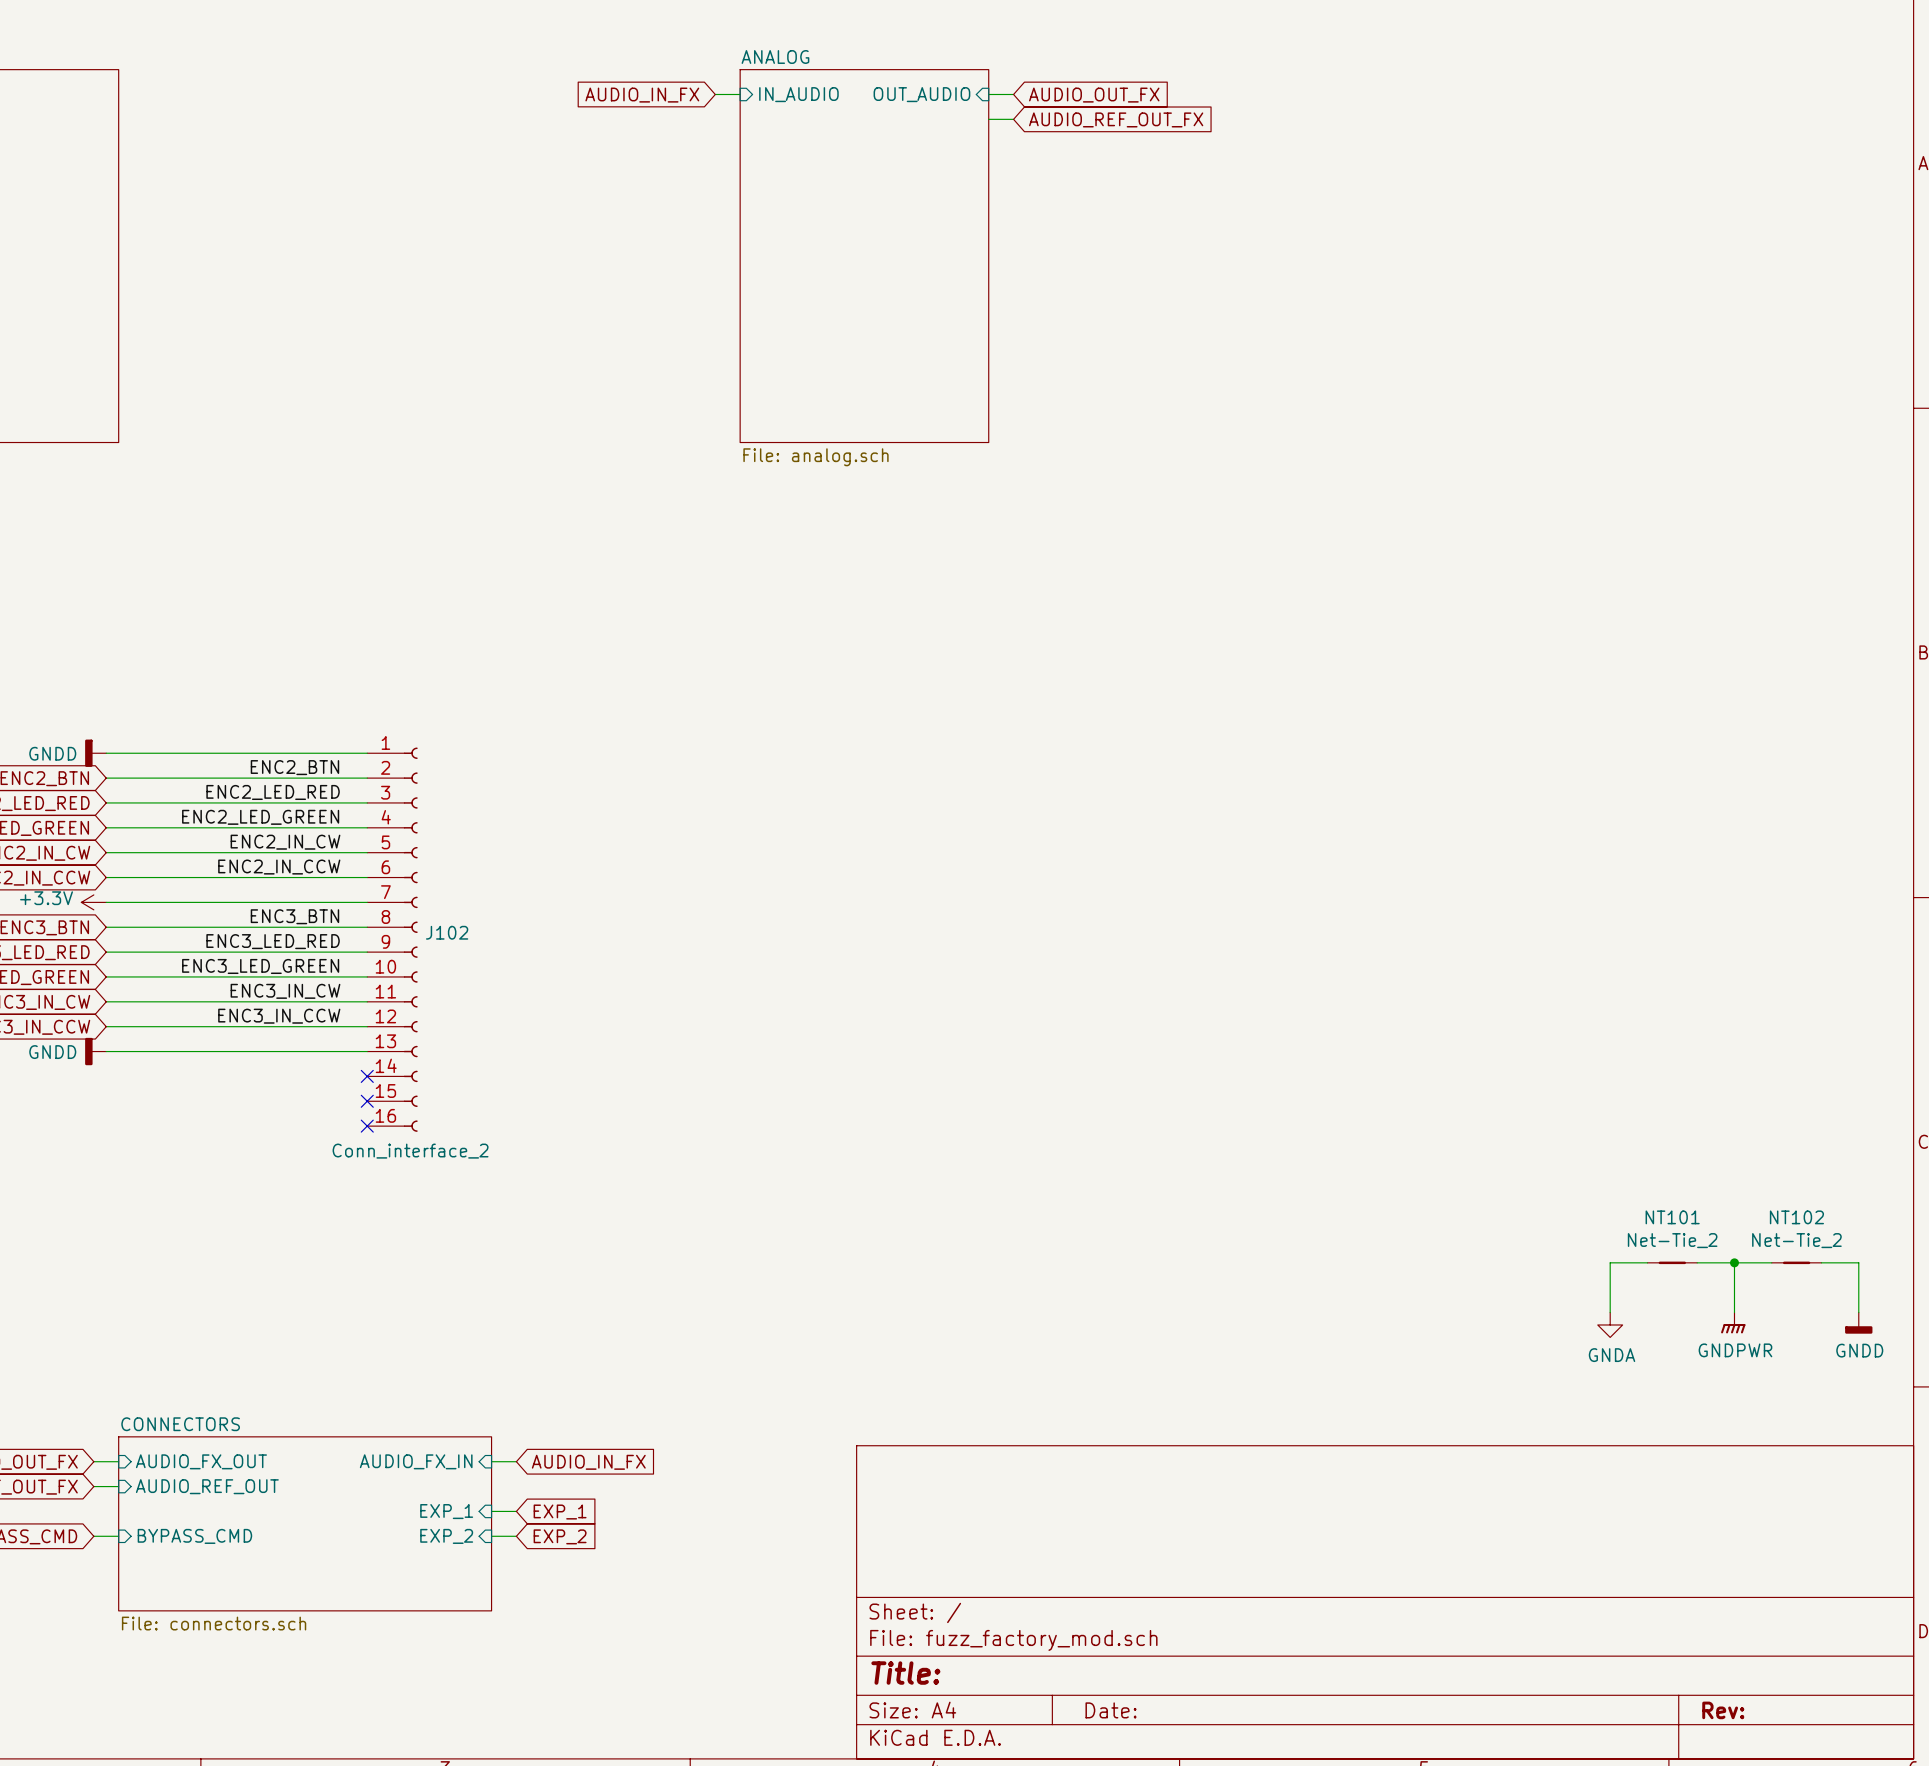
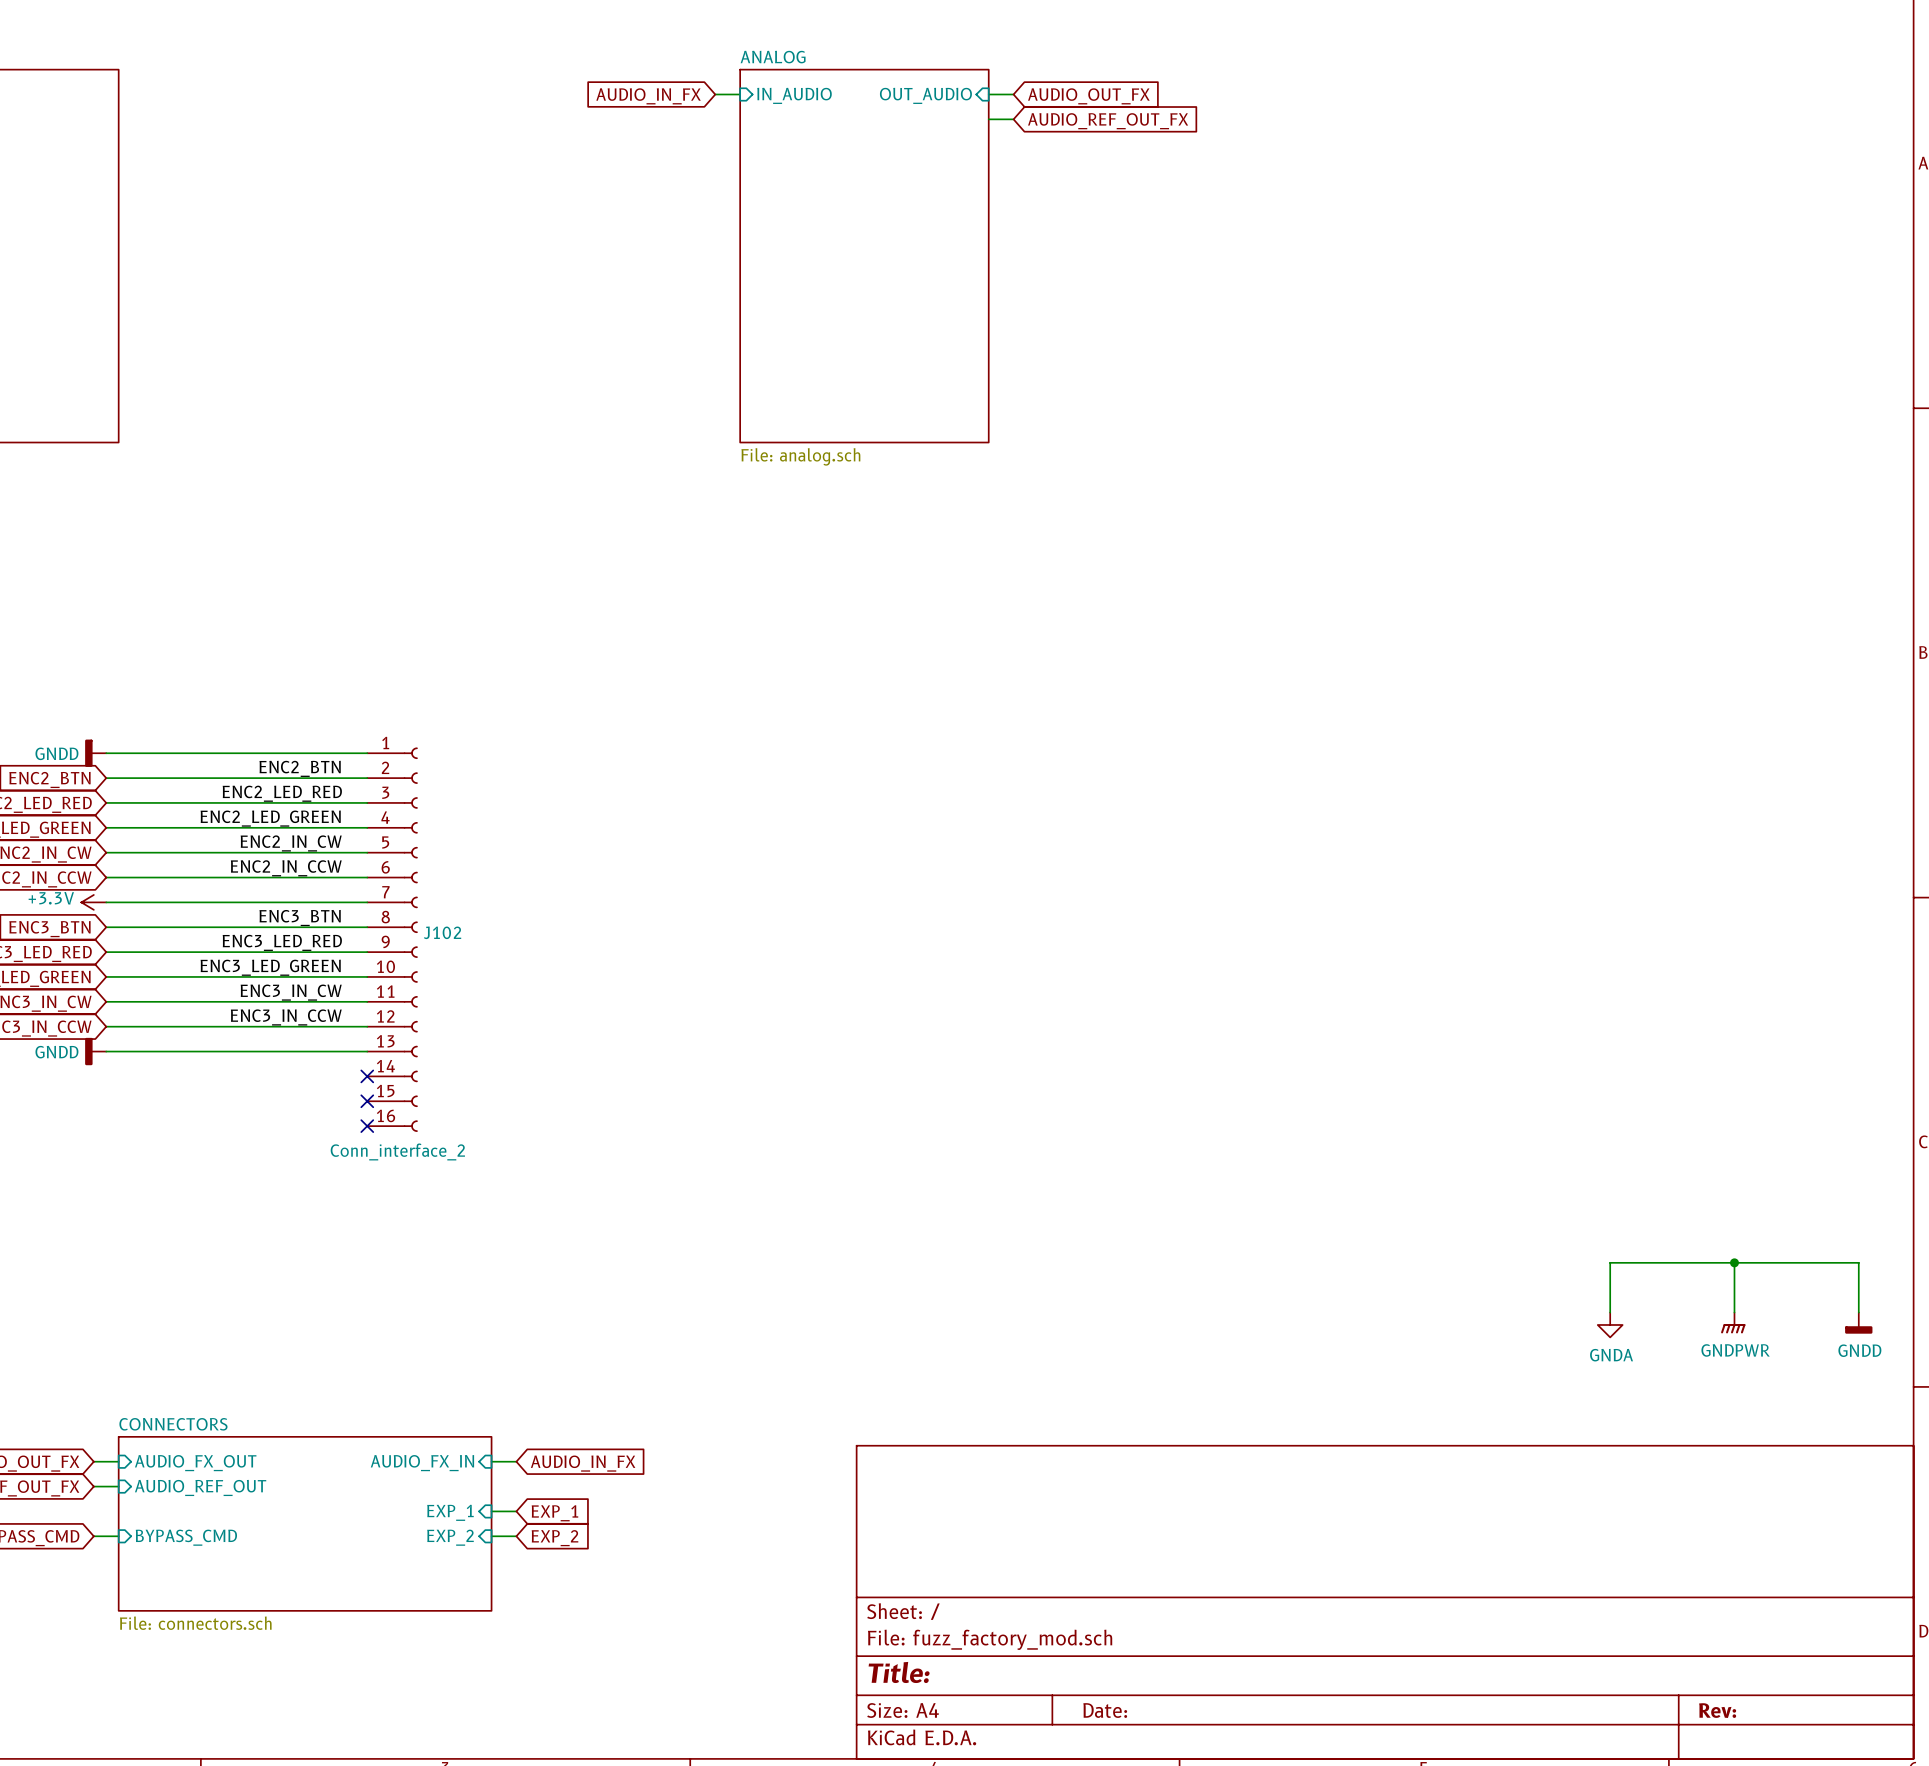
NT101: Net-Tie_2 (1672, 1262) -> none
NT102: Net-Tie_2 (1796, 1262) -> none

